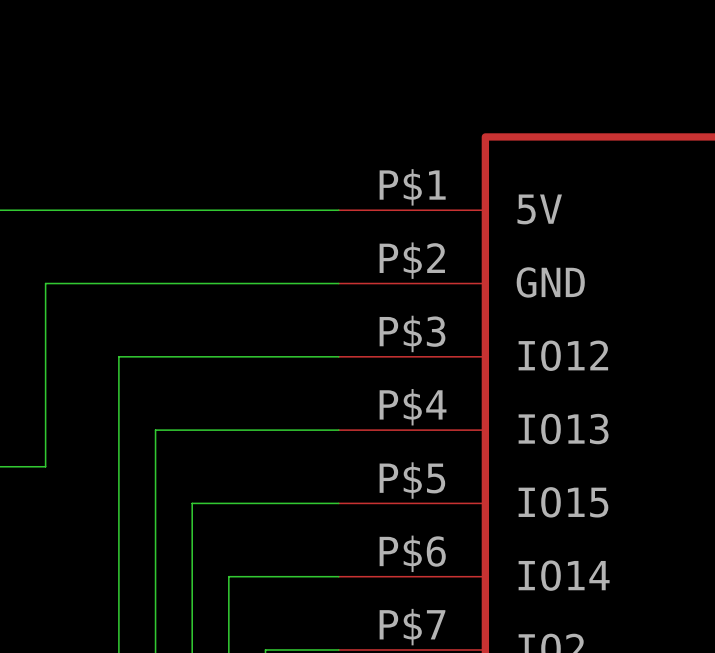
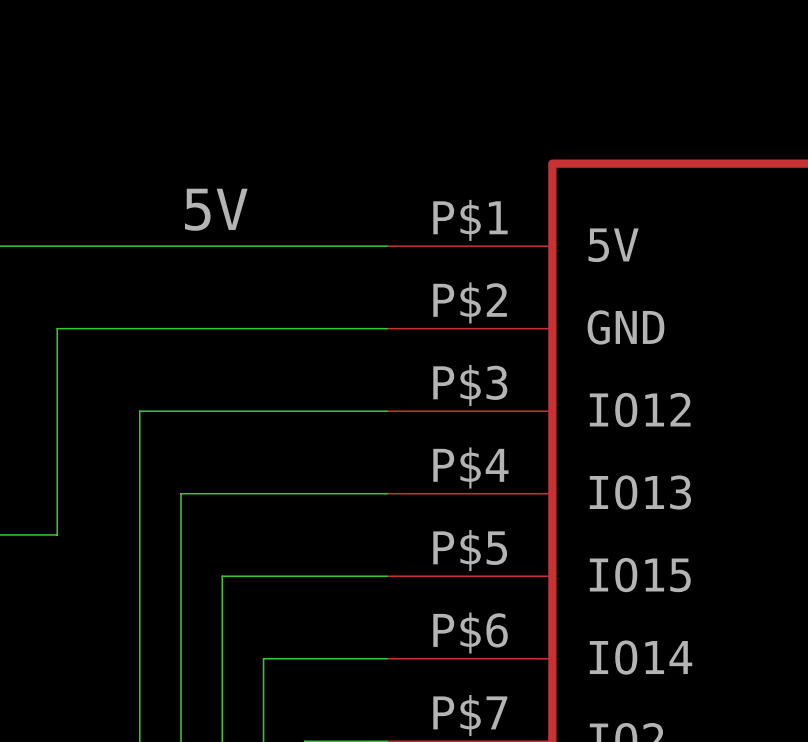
label: none -> 5V (216, 209)

